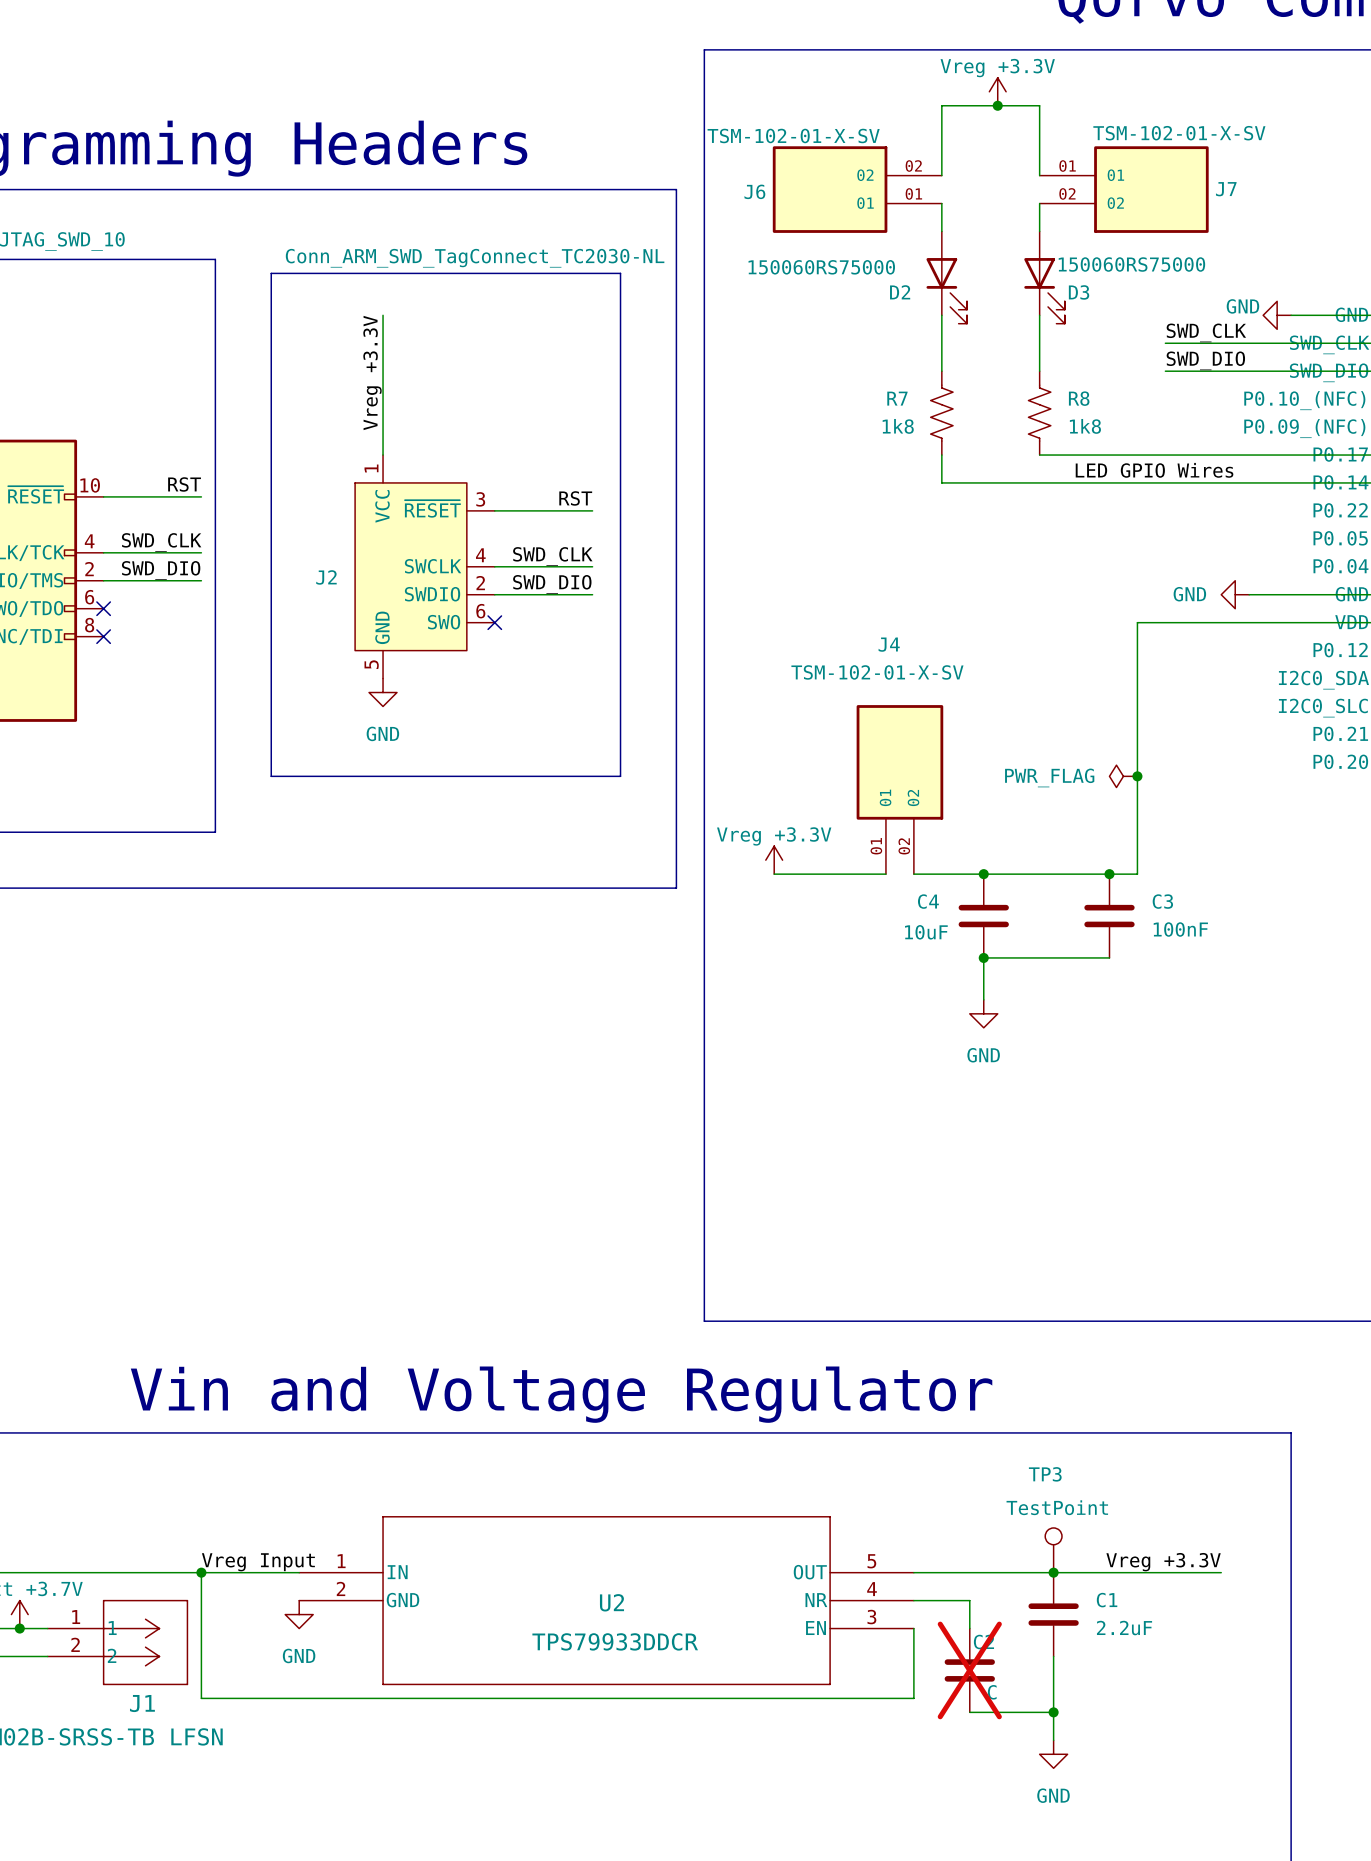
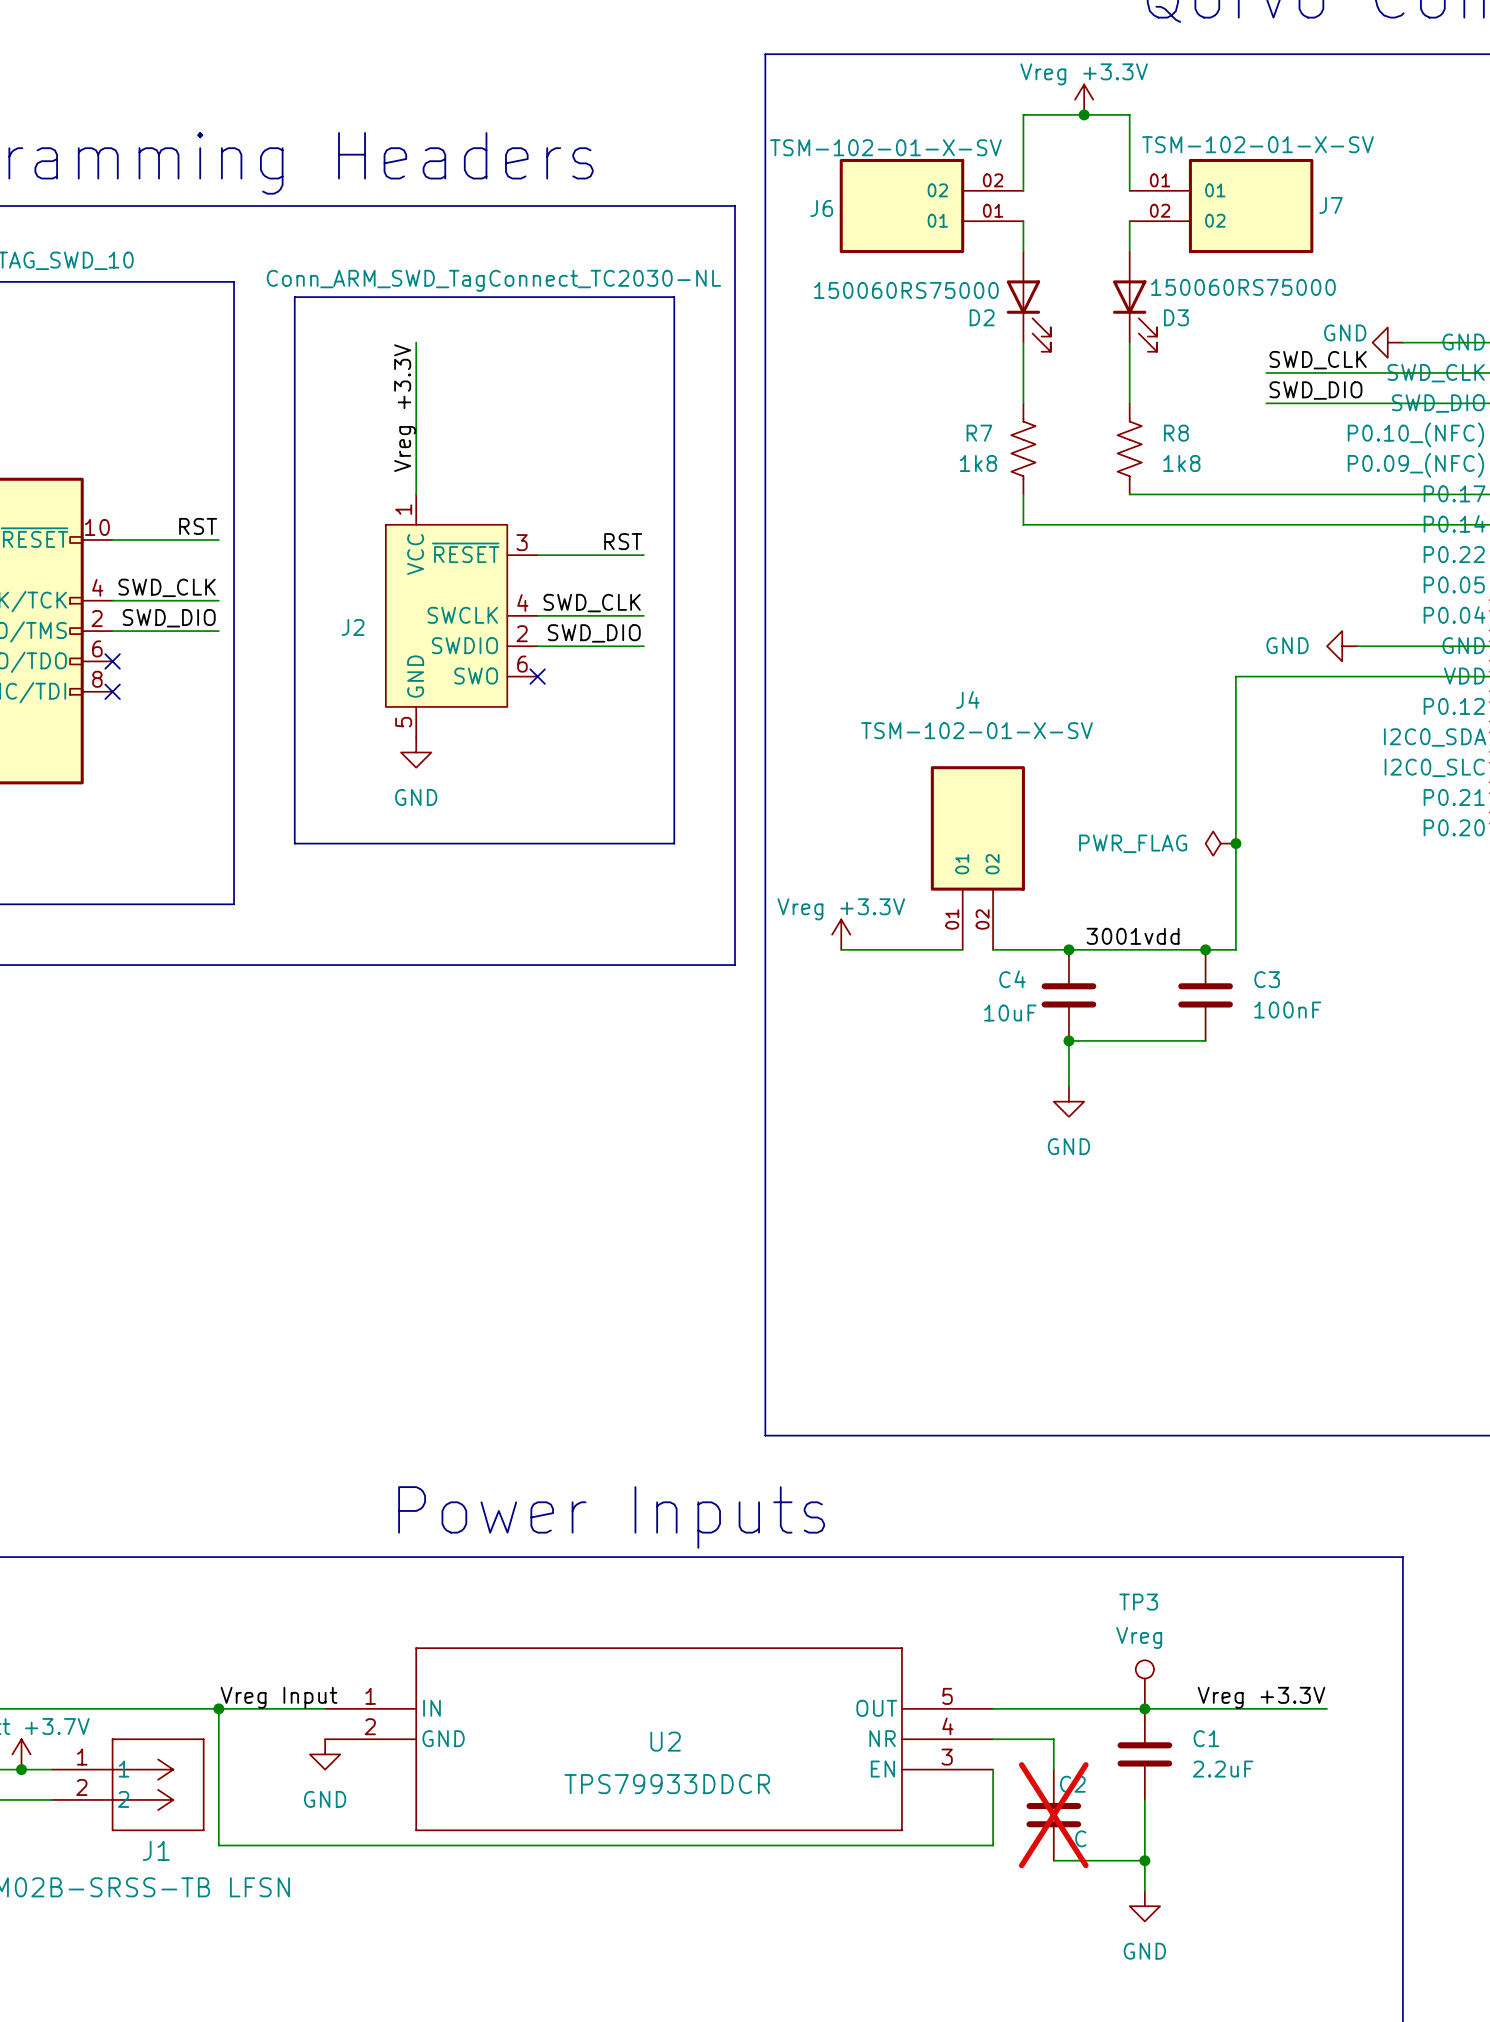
label: LED GPIO Wires (1154, 470) -> none
label: none -> 3001vdd (1133, 936)
text: Vin and Voltage Regulator (561, 1394) -> Power Inputs (611, 1517)
TP3 value: TestPoint (1057, 1507) -> Vreg (1139, 1637)

